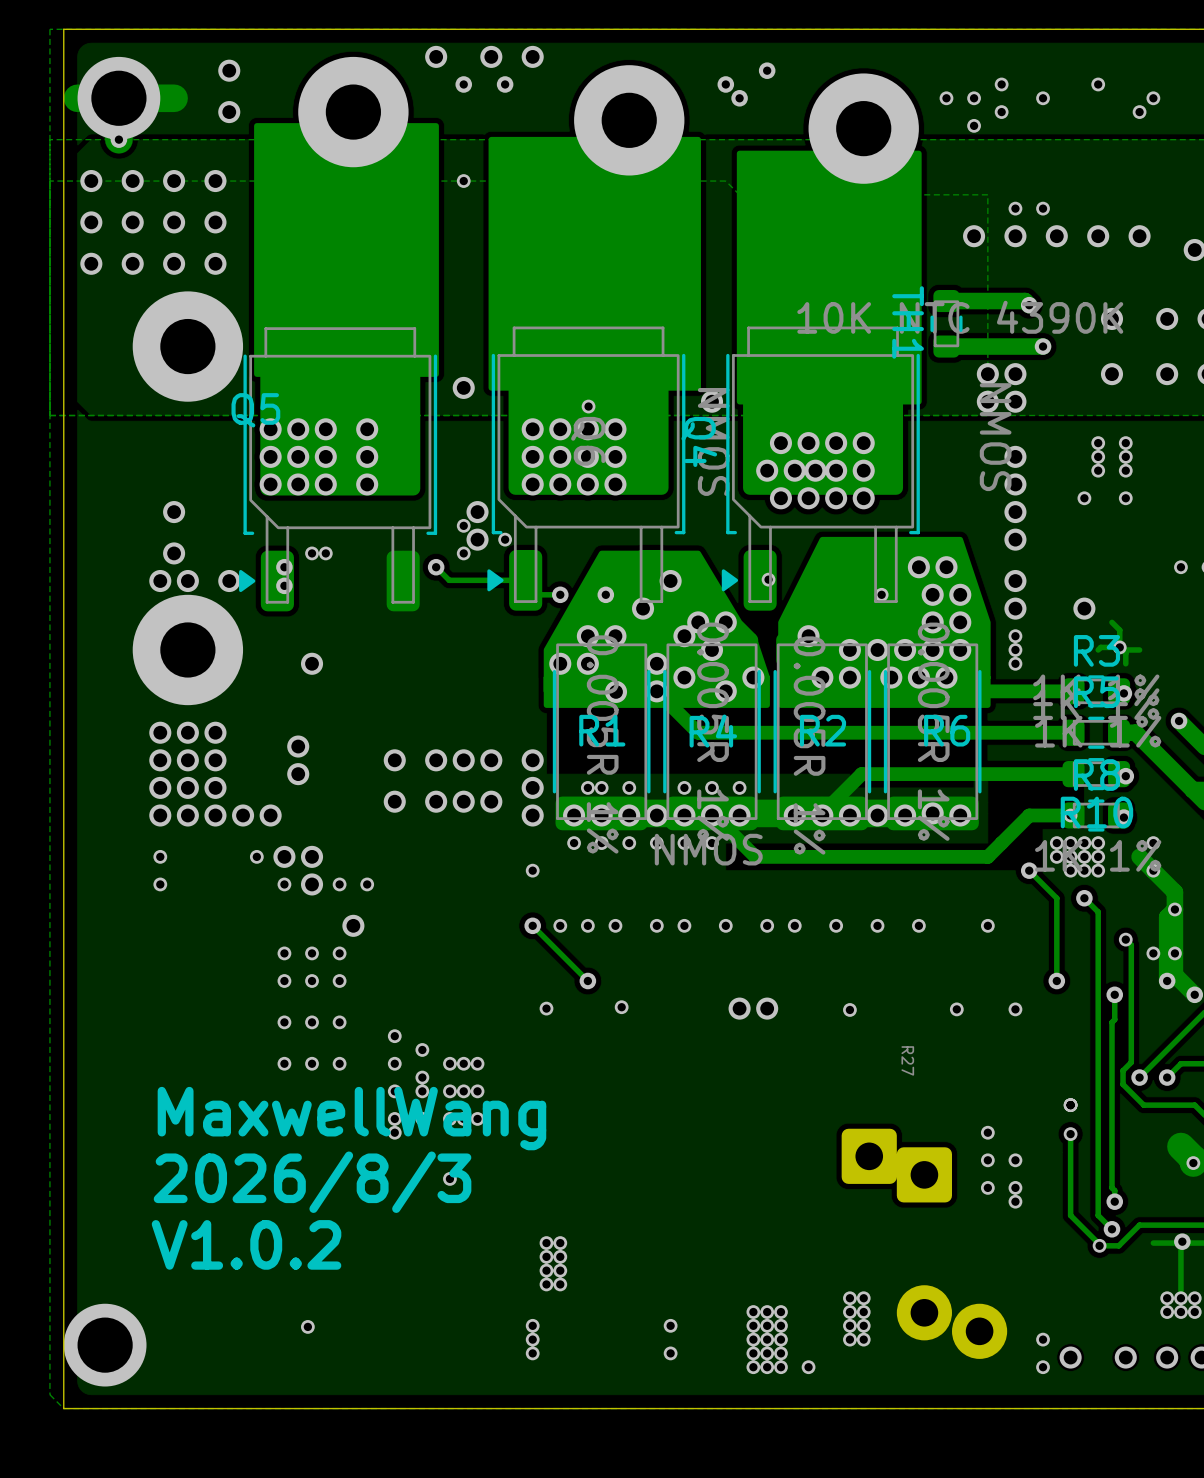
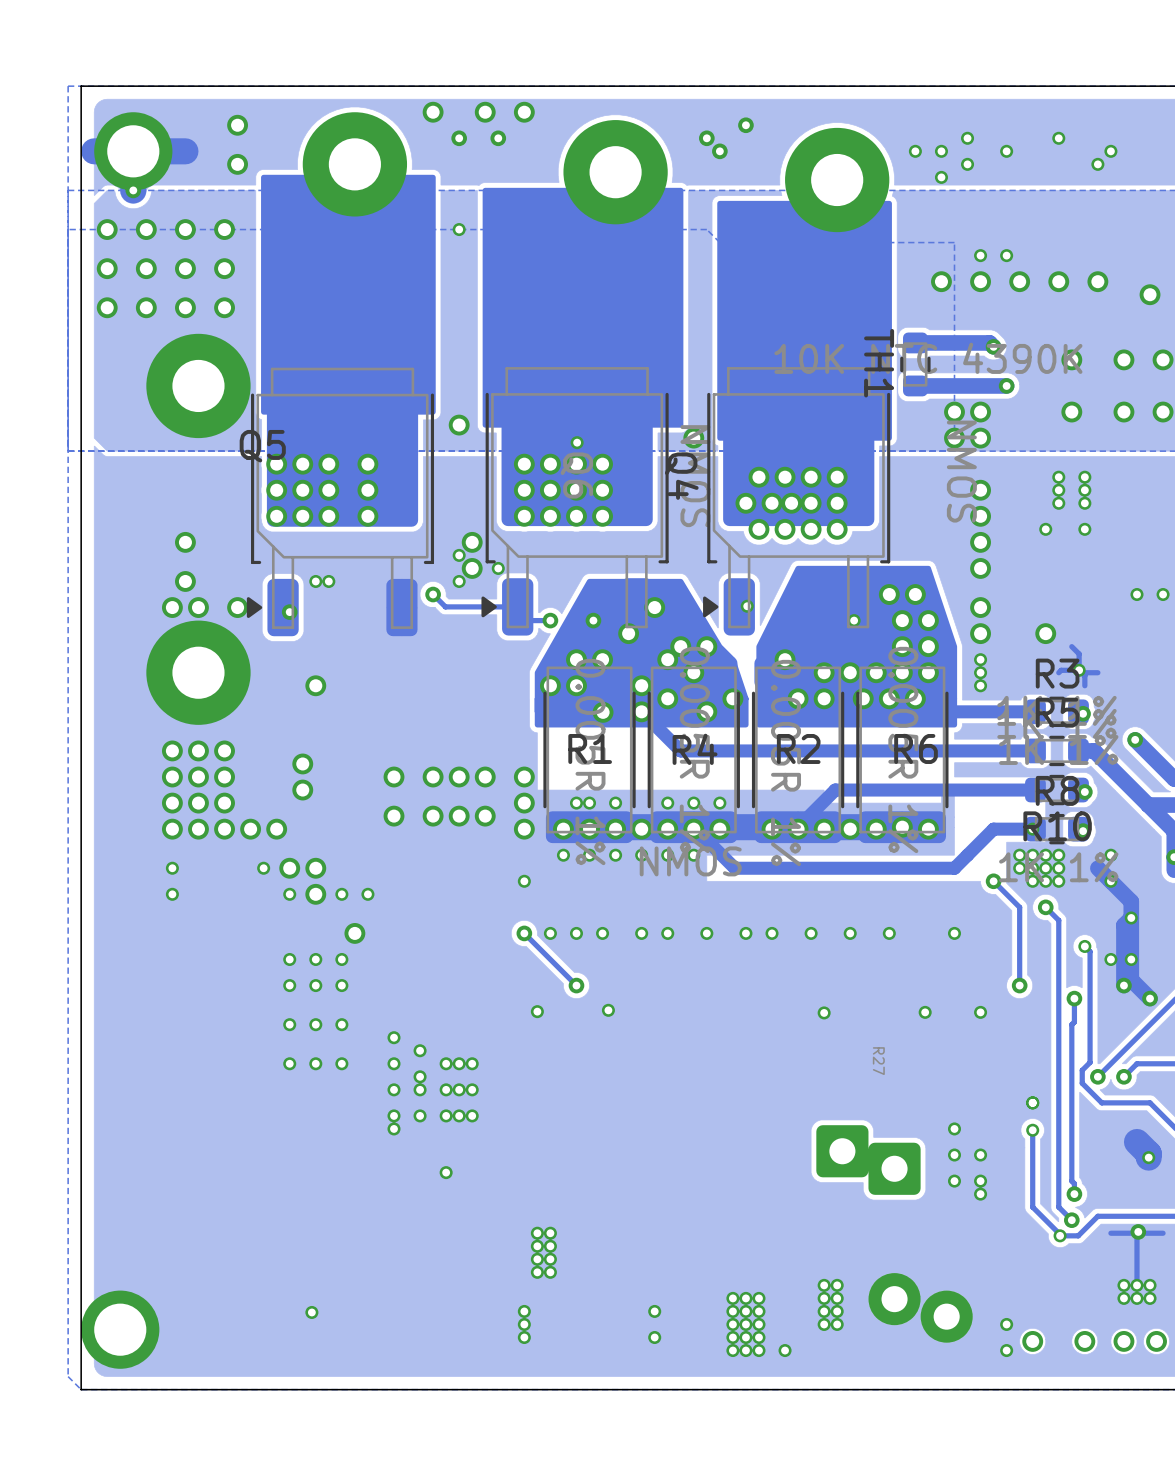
via: (284, 567) -> none
via: (739, 1008) -> none
via: (767, 1008) -> none
text: MaxwellWang (351, 1118) -> none
text: 2026/8/3 (312, 1182) -> none
text: V1.0.2 (246, 1244) -> none

